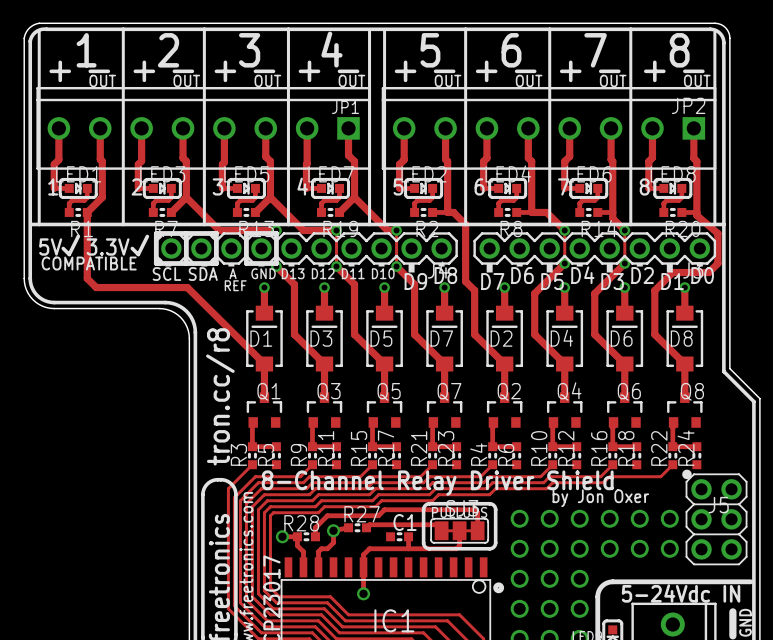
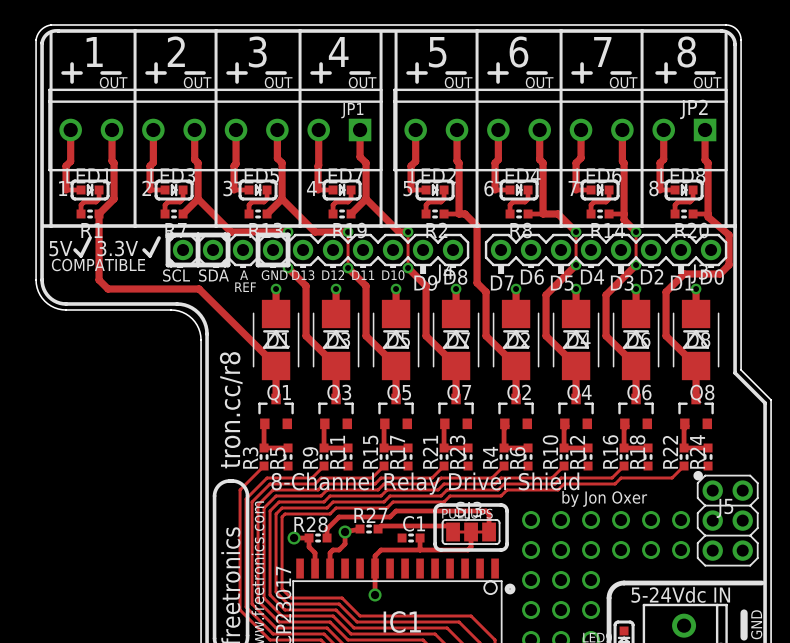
D1 footprint: [246, 305, 283, 372] -> [252, 299, 300, 381]
D3 footprint: [306, 305, 343, 372] -> [312, 299, 360, 381]
D5 footprint: [366, 305, 403, 372] -> [372, 299, 420, 381]
D7 footprint: [426, 305, 463, 372] -> [432, 299, 480, 381]
D2 footprint: [486, 305, 524, 372] -> [492, 299, 540, 381]
D4 footprint: [546, 305, 584, 372] -> [552, 299, 600, 381]
D6 footprint: [606, 305, 644, 372] -> [612, 299, 660, 381]
D8 footprint: [666, 305, 704, 372] -> [672, 299, 720, 381]

